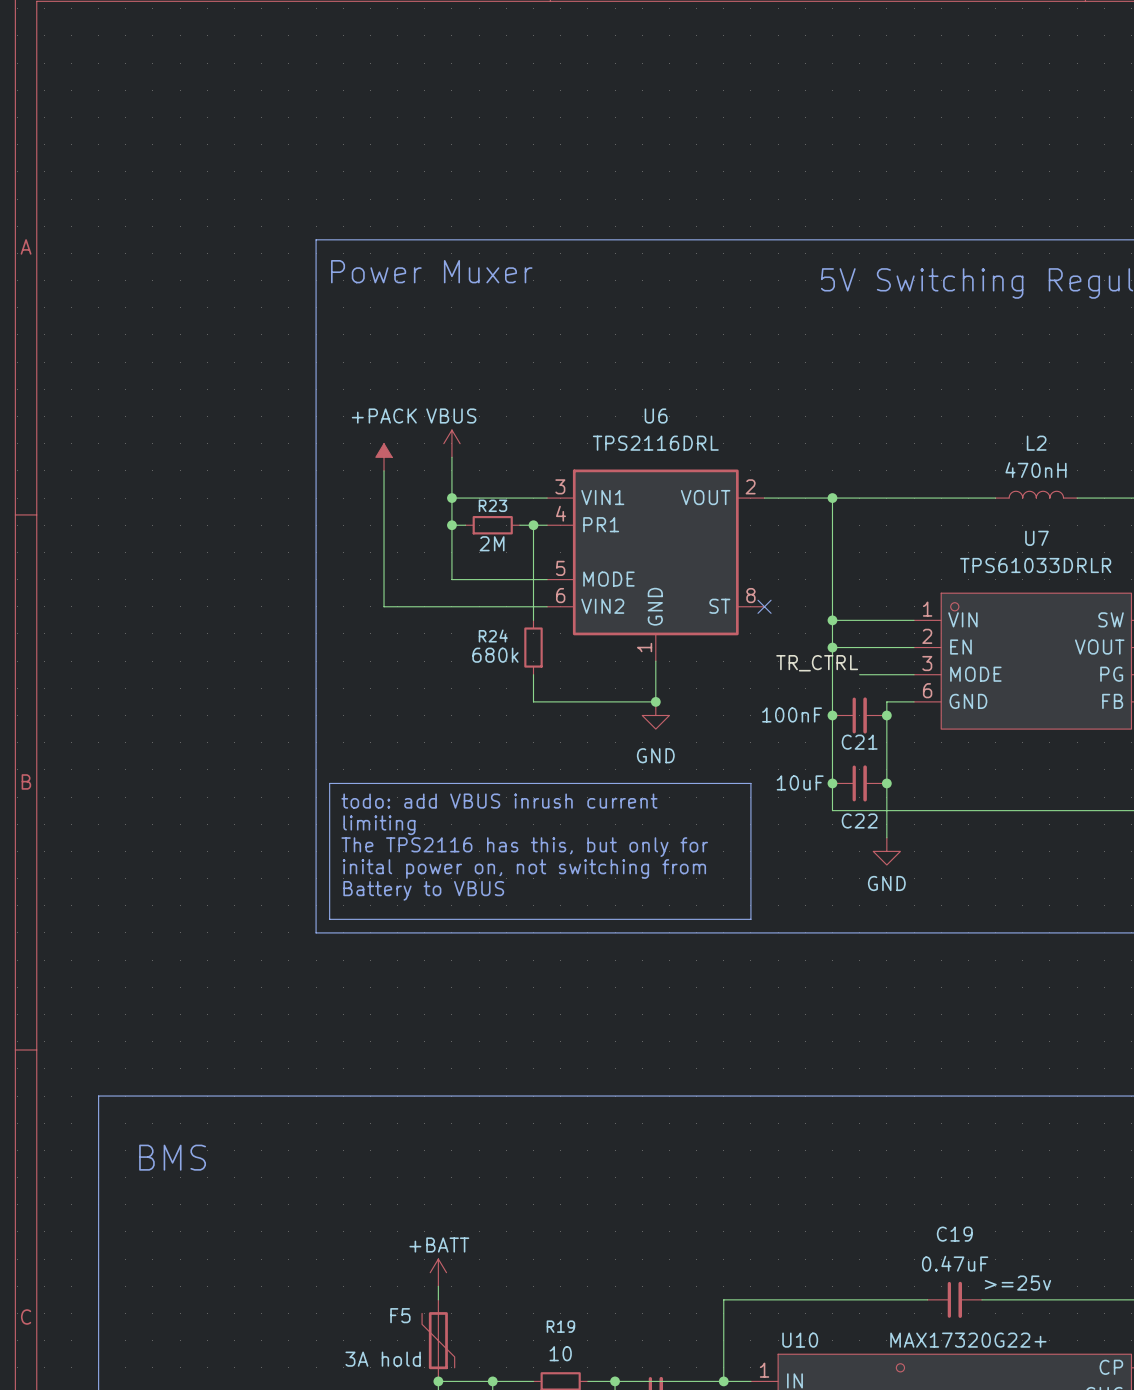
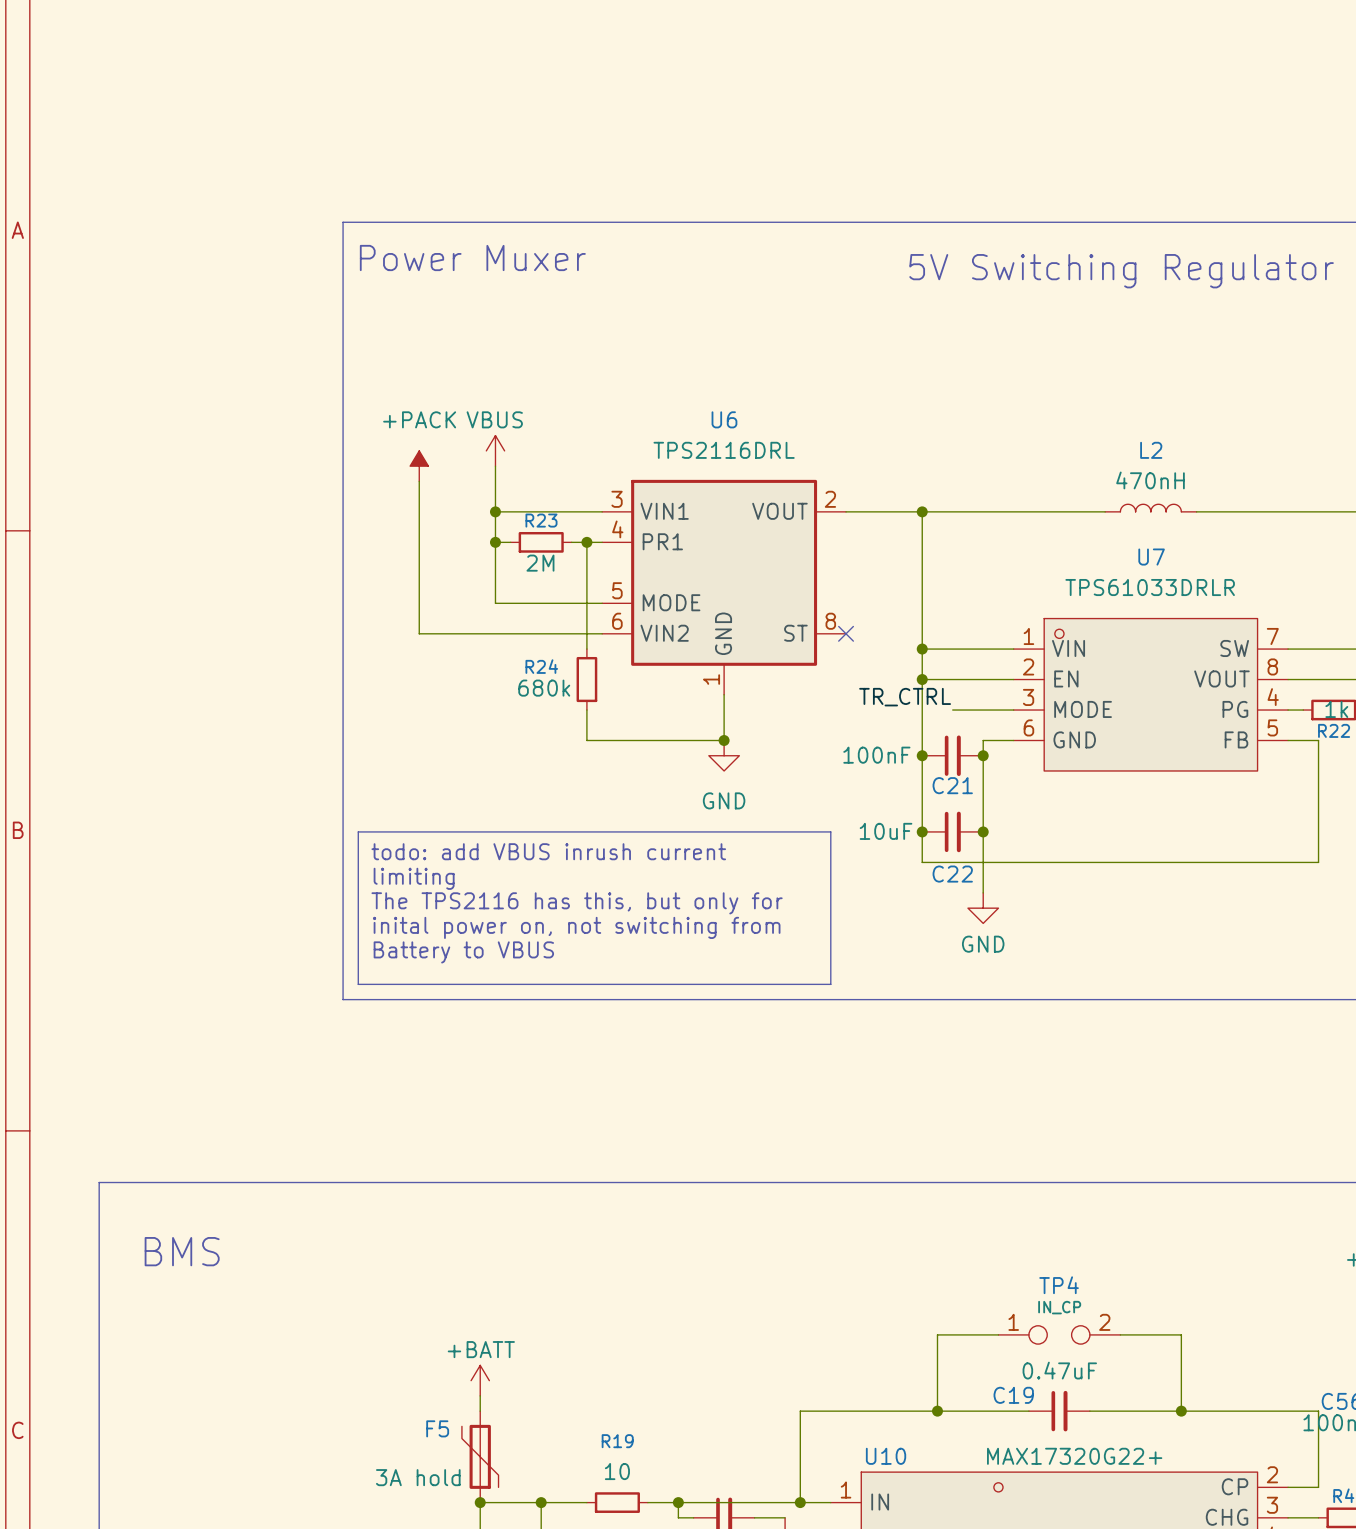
wire: none -> (998, 1334) (937, 1334) (937, 1411)
TP4: none -> IN_CP (1059, 1334)
wire: none -> (1120, 1334) (1181, 1334) (1181, 1411)
C19 name position: C19 (954, 1234) -> C19 (1013, 1395)
C19 text: >=25v (1017, 1283) -> none
junction: none -> (937, 1411)
junction: none -> (1181, 1411)

